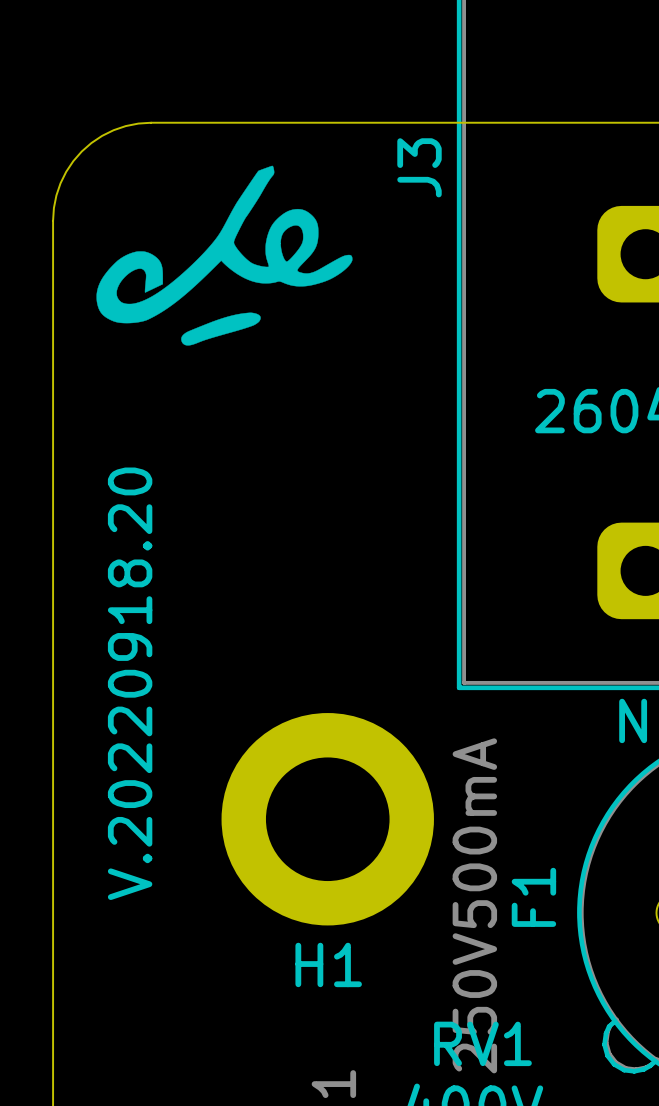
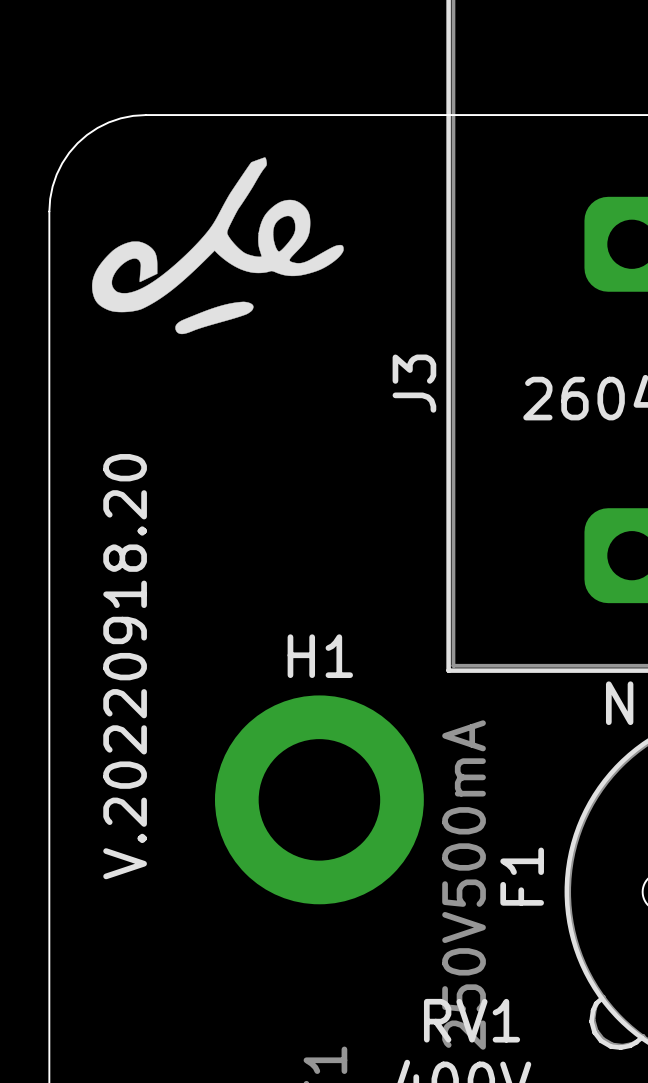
J3 name position: J3 (419, 167) -> J3 (414, 383)
H1 name position: H1 (328, 964) -> H1 (320, 656)

